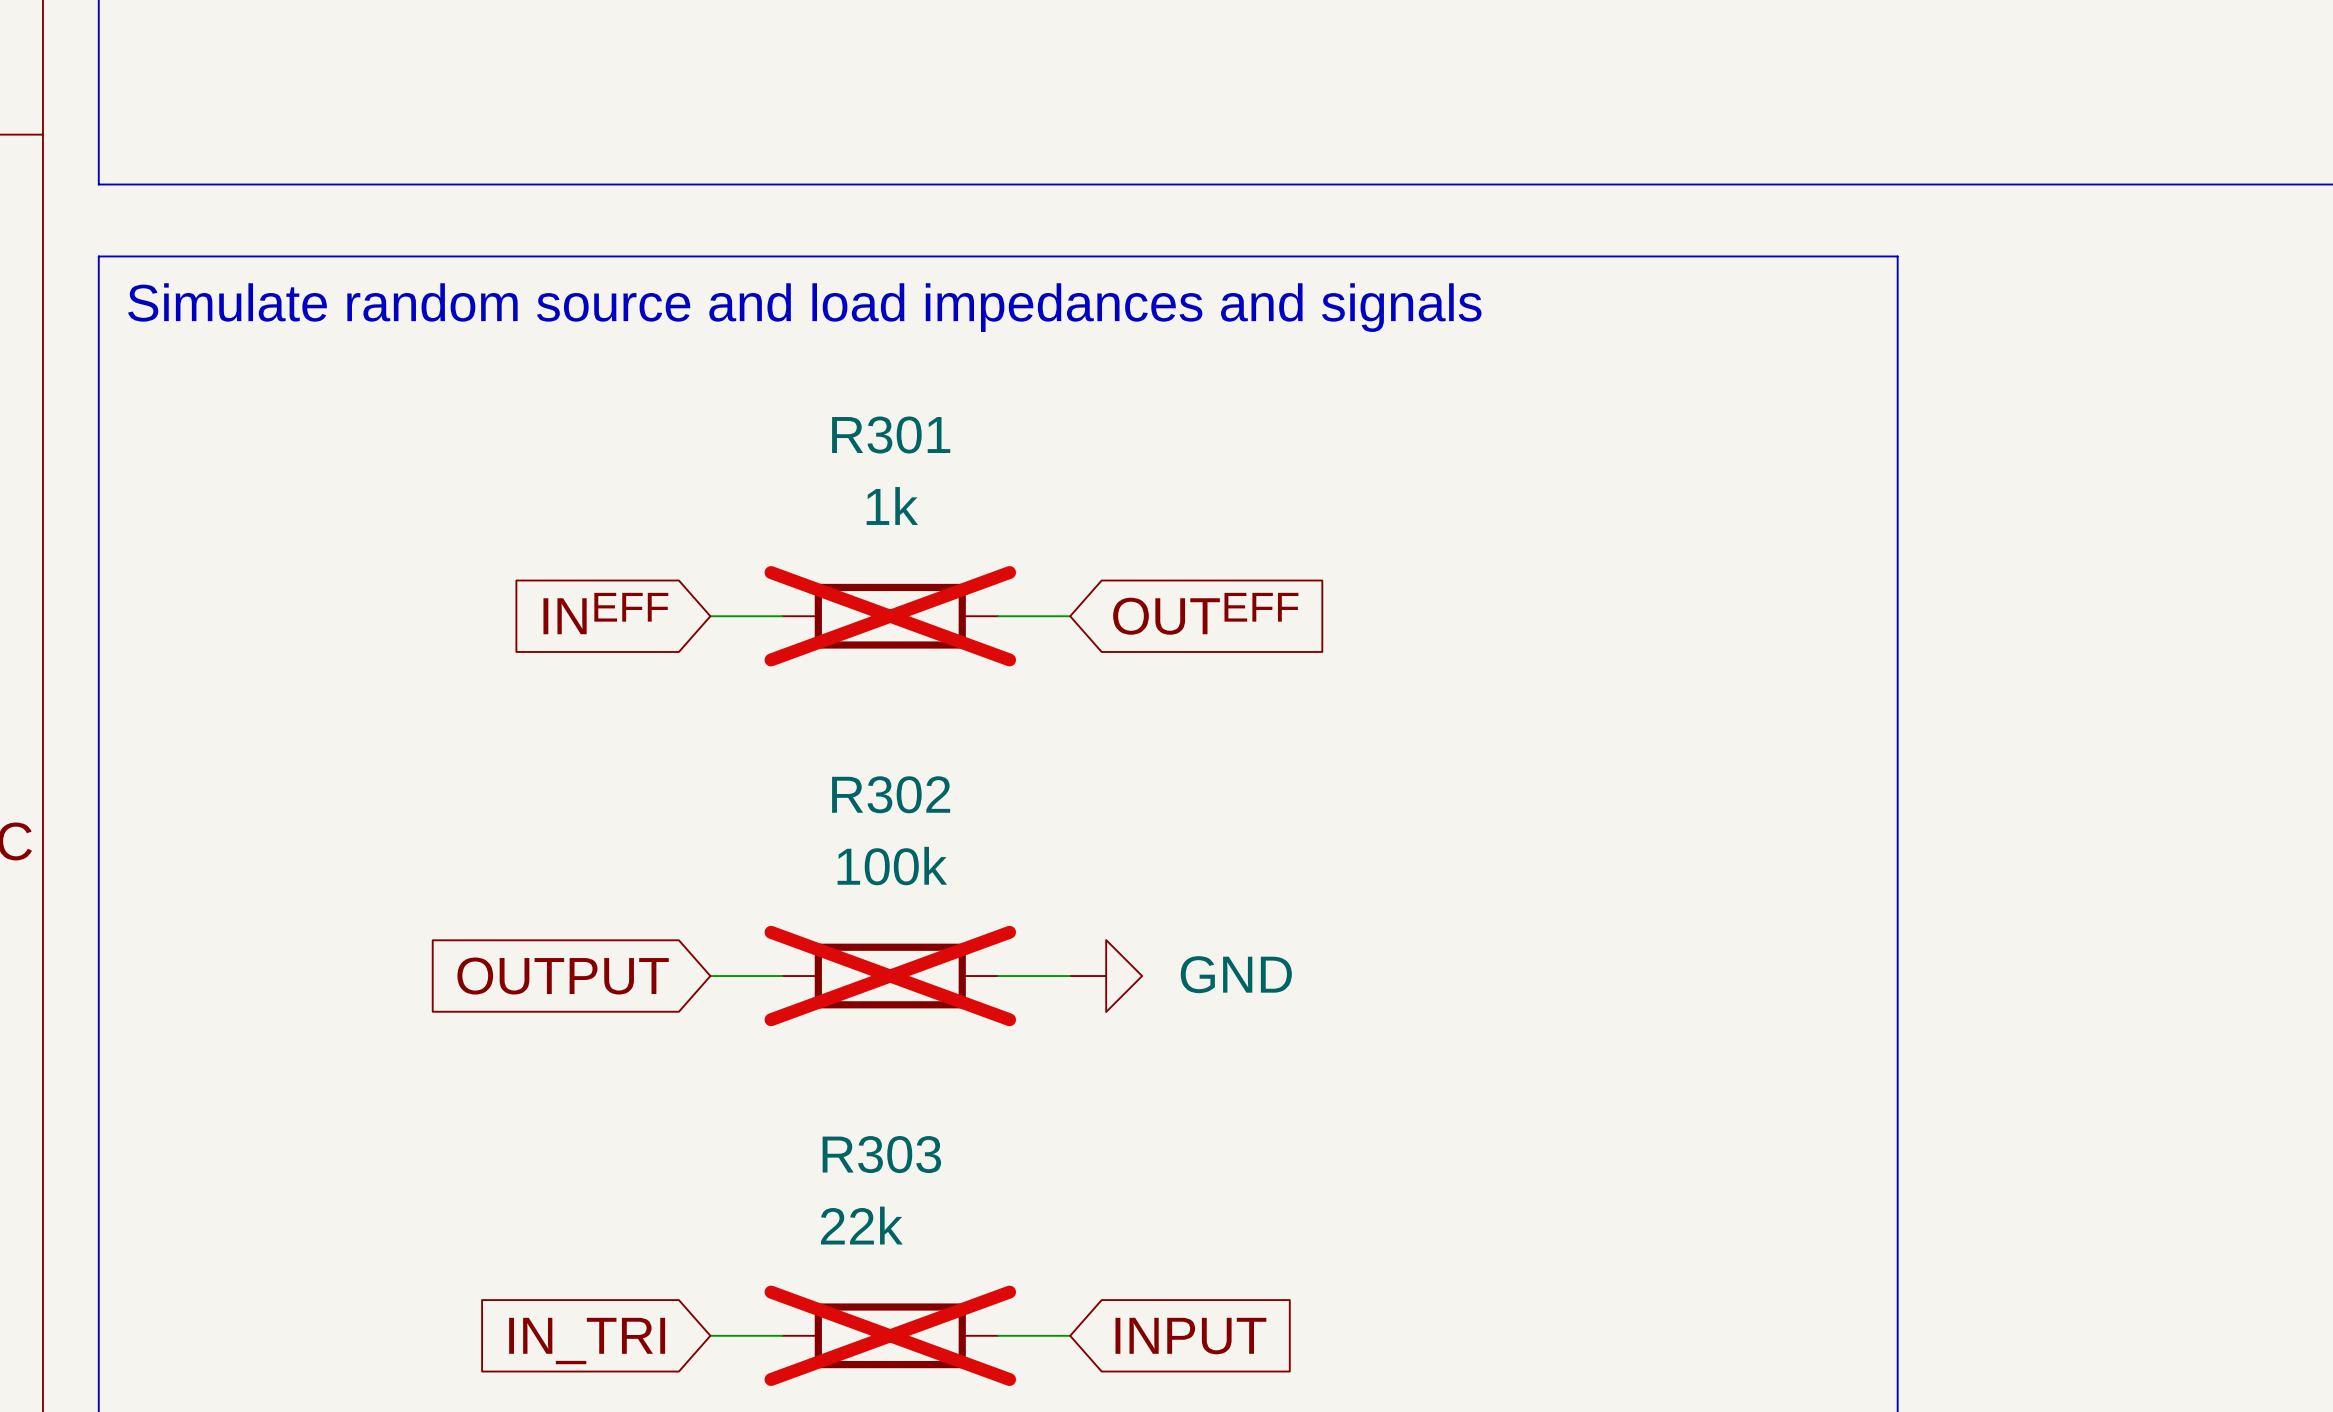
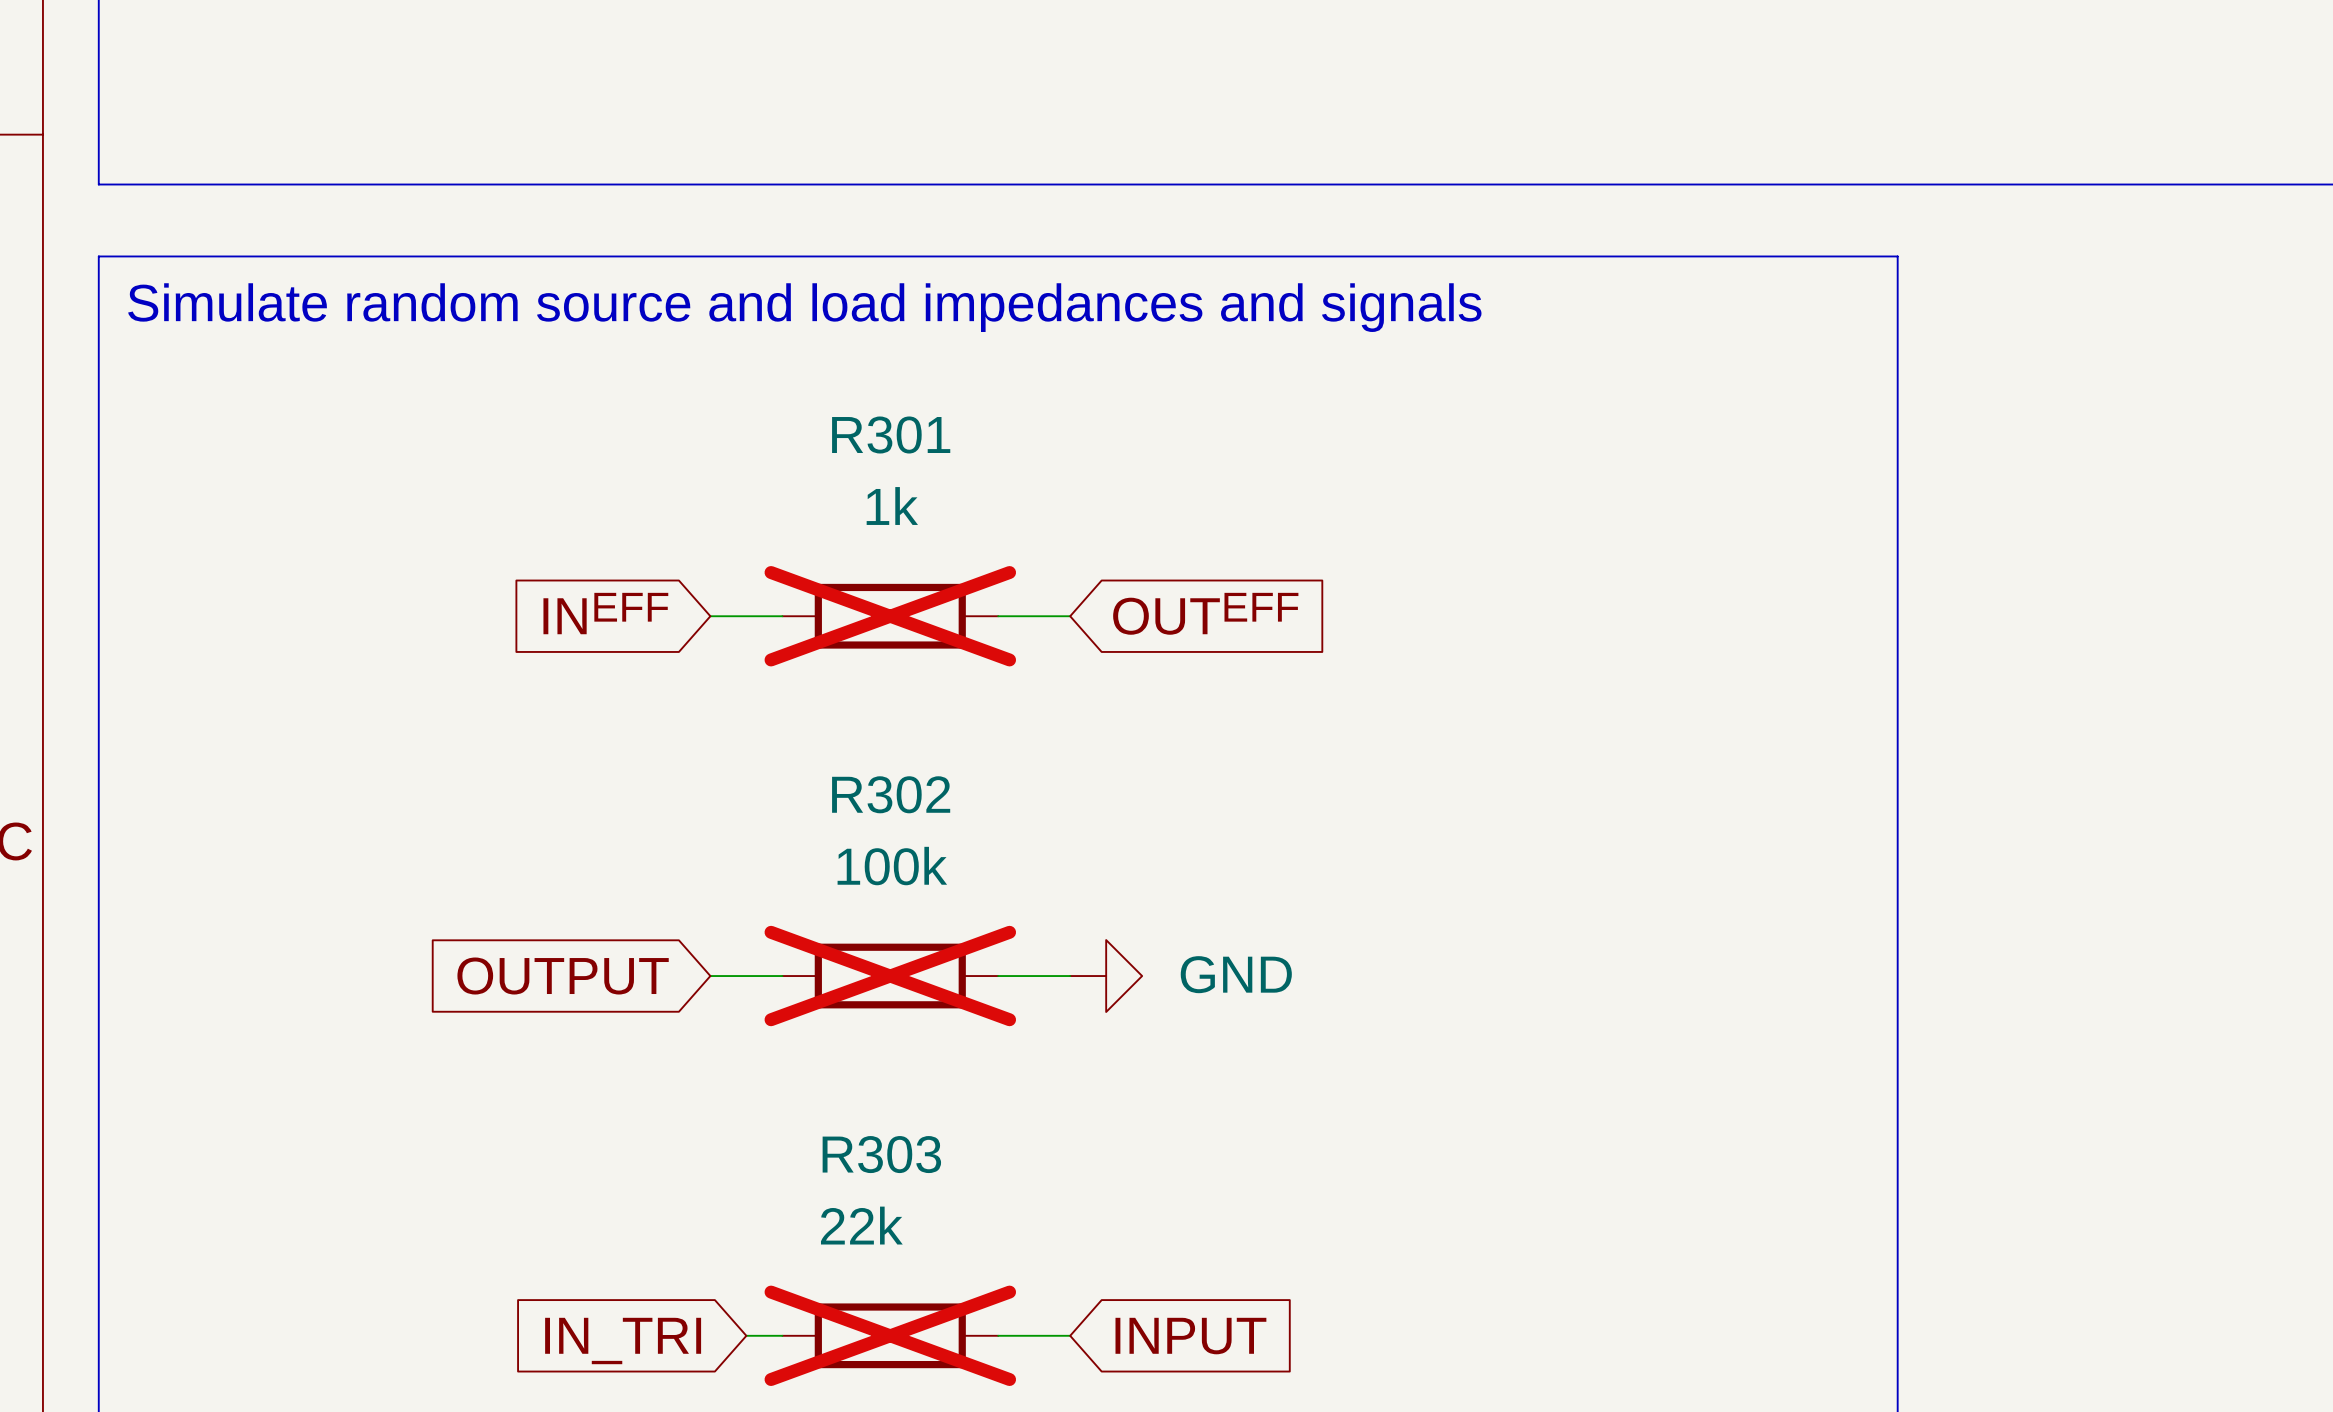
wire: (710, 1335) (746, 1335) -> none
global label position: IN_TRI (587, 1341) -> IN_TRI (623, 1341)

